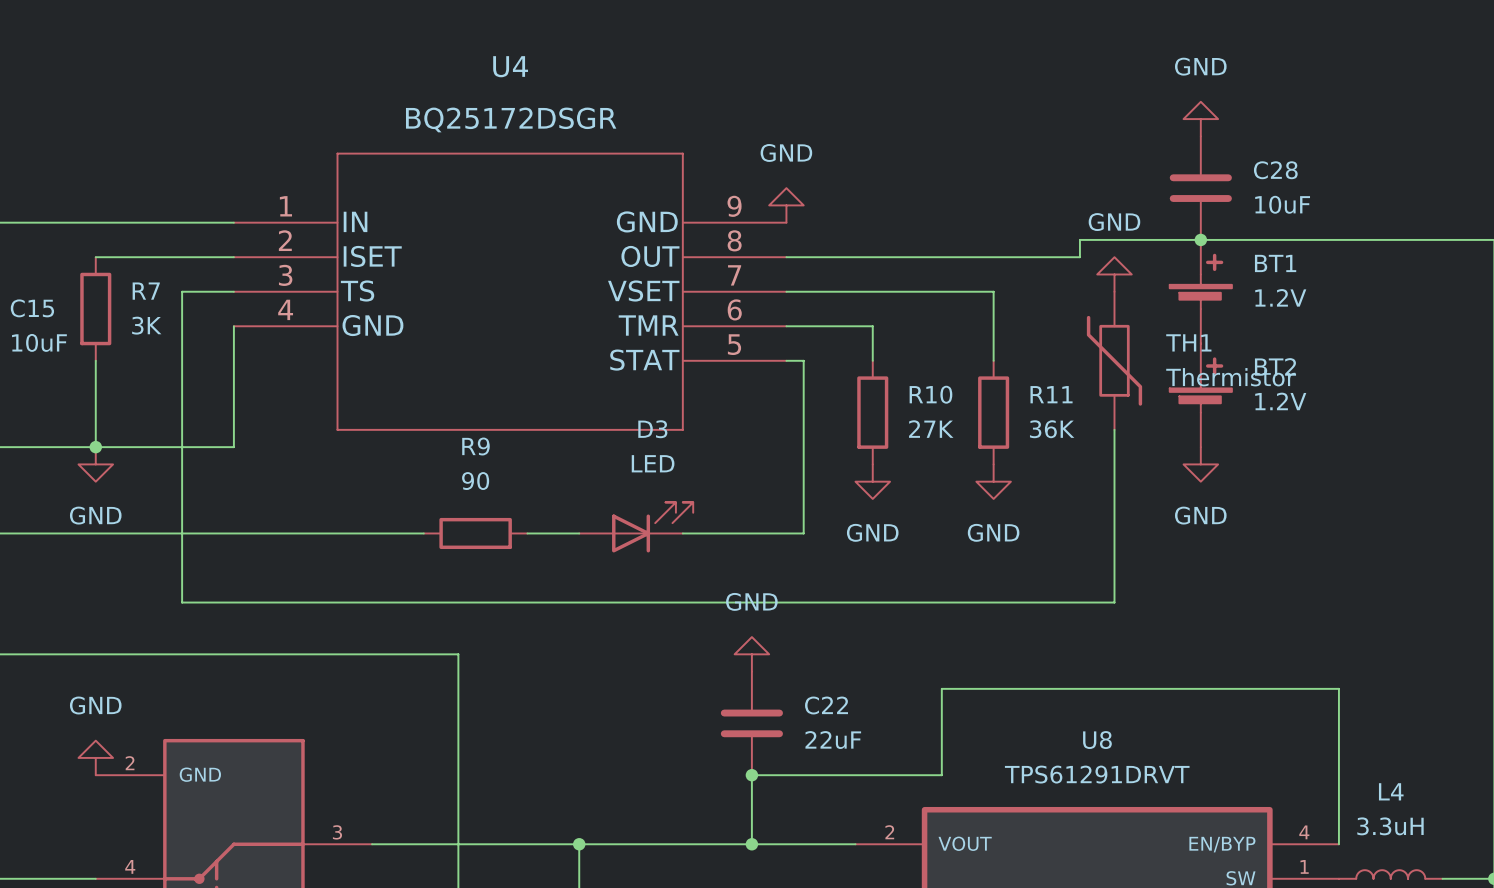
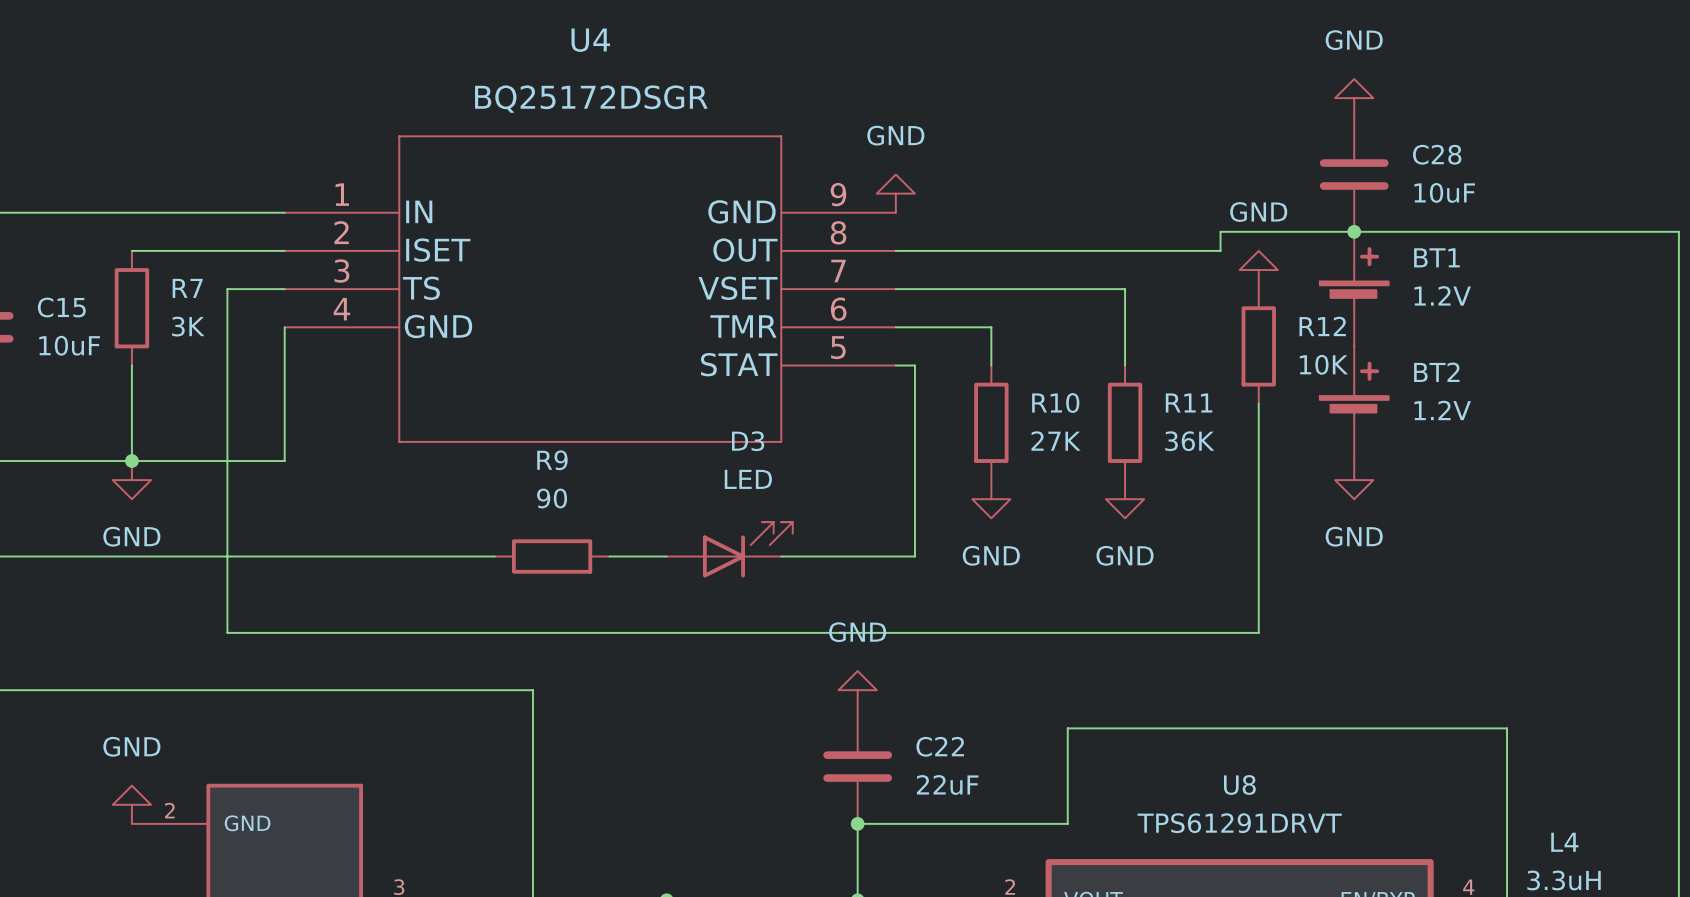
R12: none -> 10K (1258, 346)
TH1: Thermistor (1114, 360) -> none

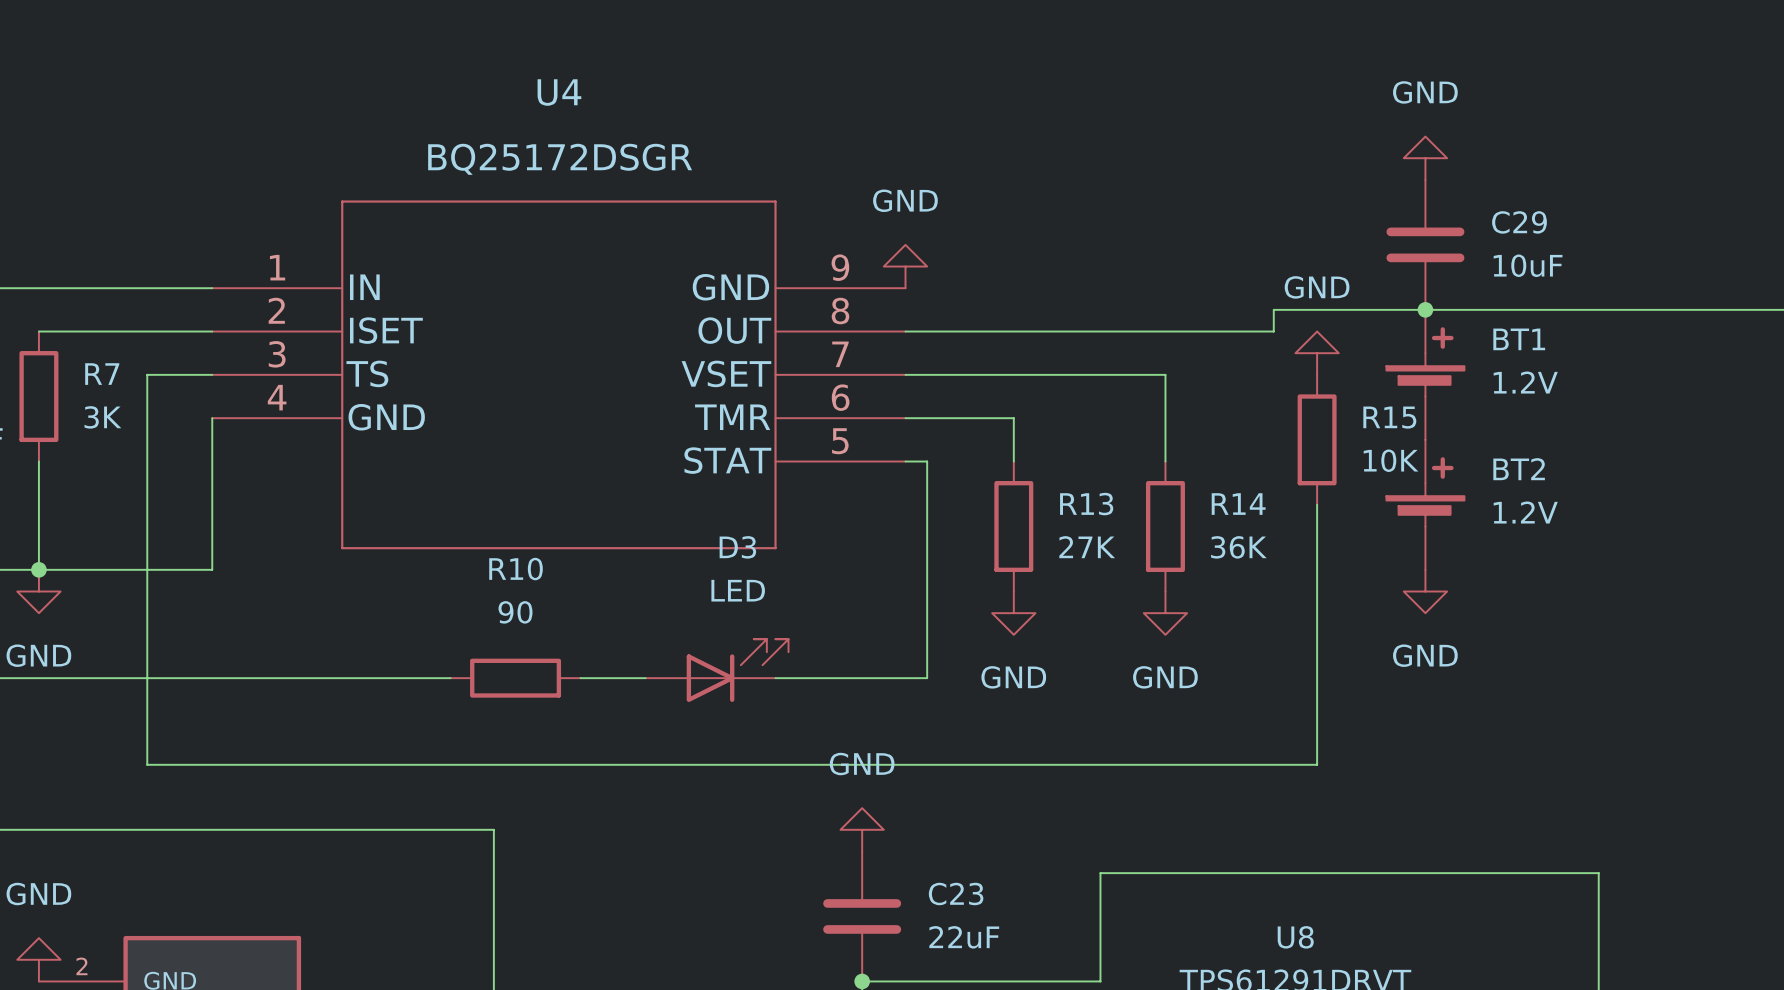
C28 name: C28 (1437, 154) -> C29 (1519, 222)
R12 name: R12 (1322, 326) -> R15 (1389, 417)
R11 name: R11 (1189, 402) -> R14 (1238, 504)
R10 name: R10 (1055, 403) -> R13 (1086, 504)
R9 name: R9 (552, 460) -> R10 (516, 569)
C22 name: C22 (940, 746) -> C23 (956, 894)

